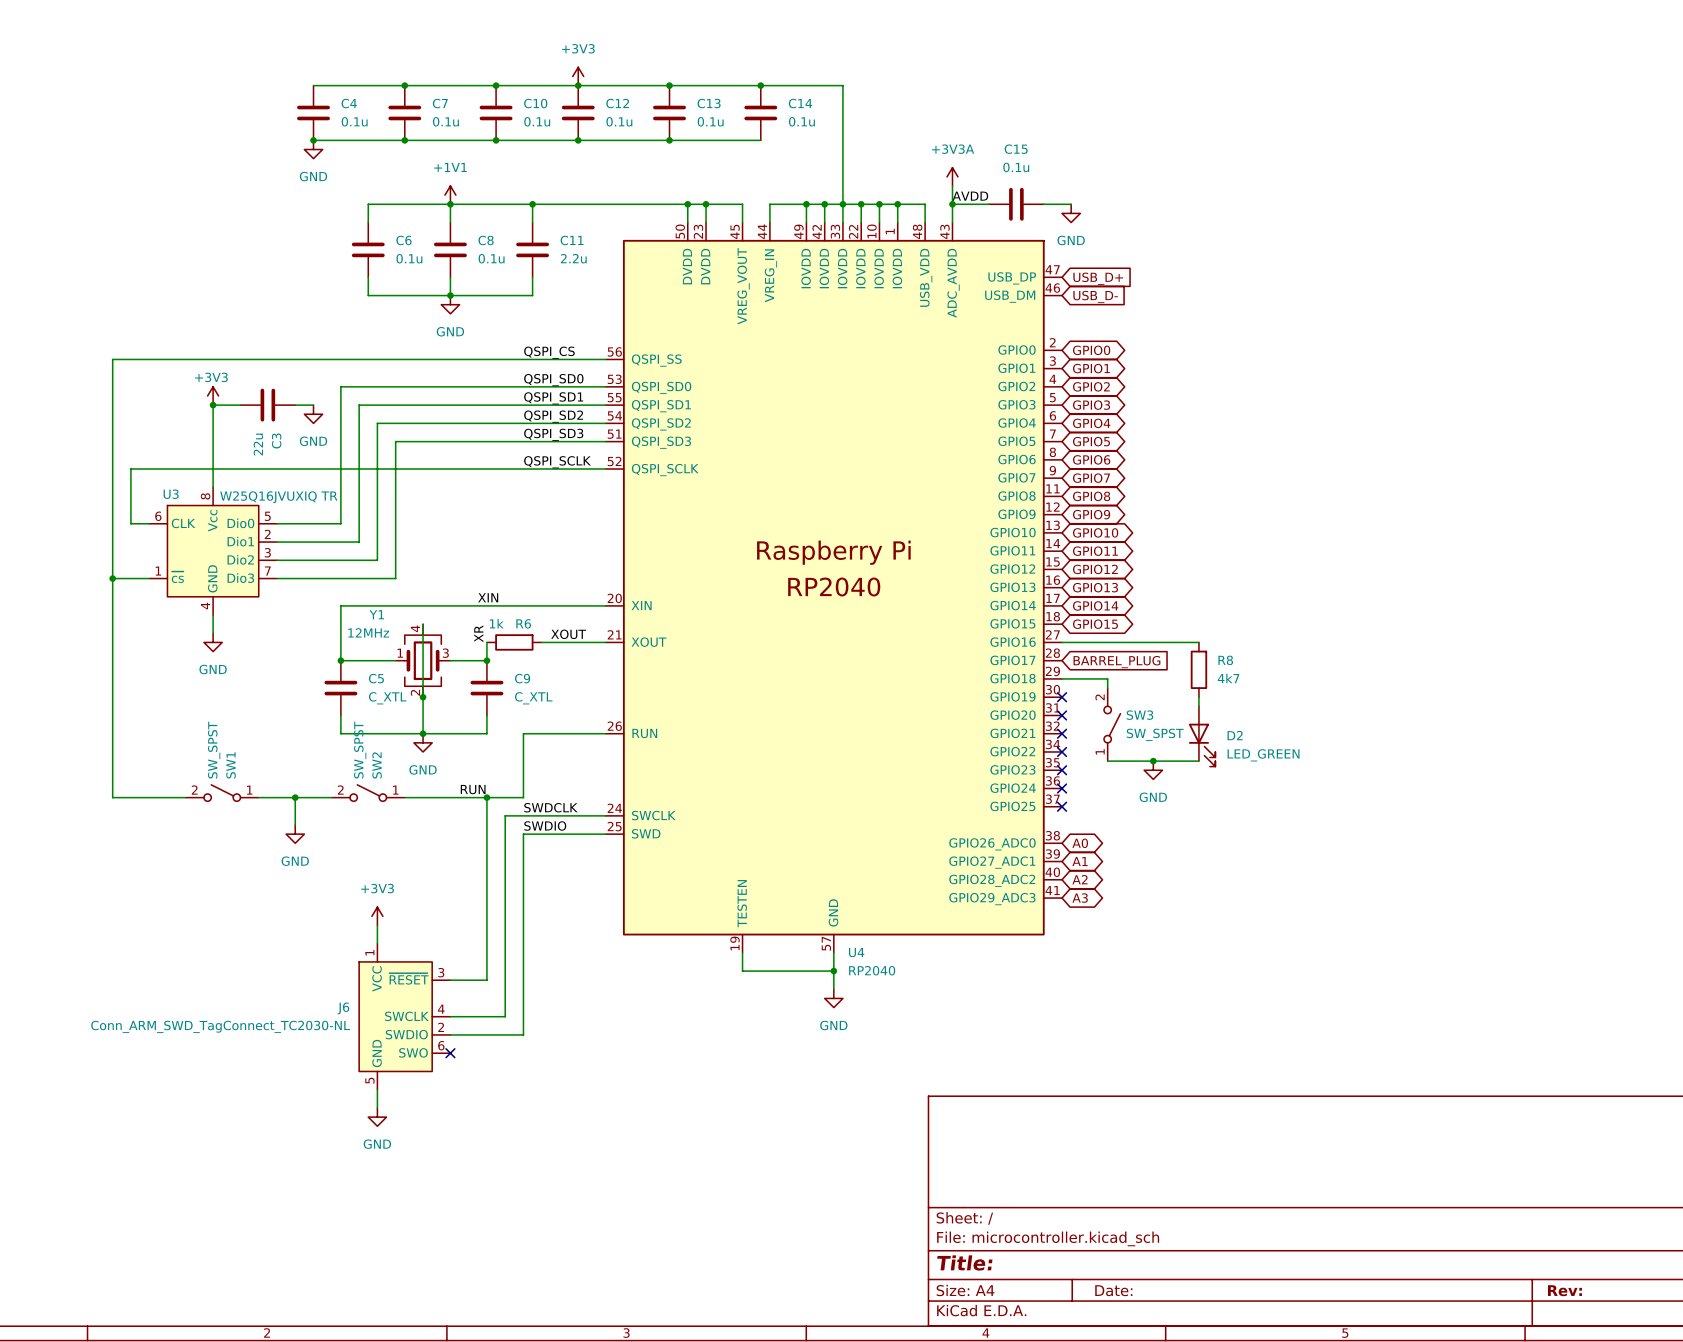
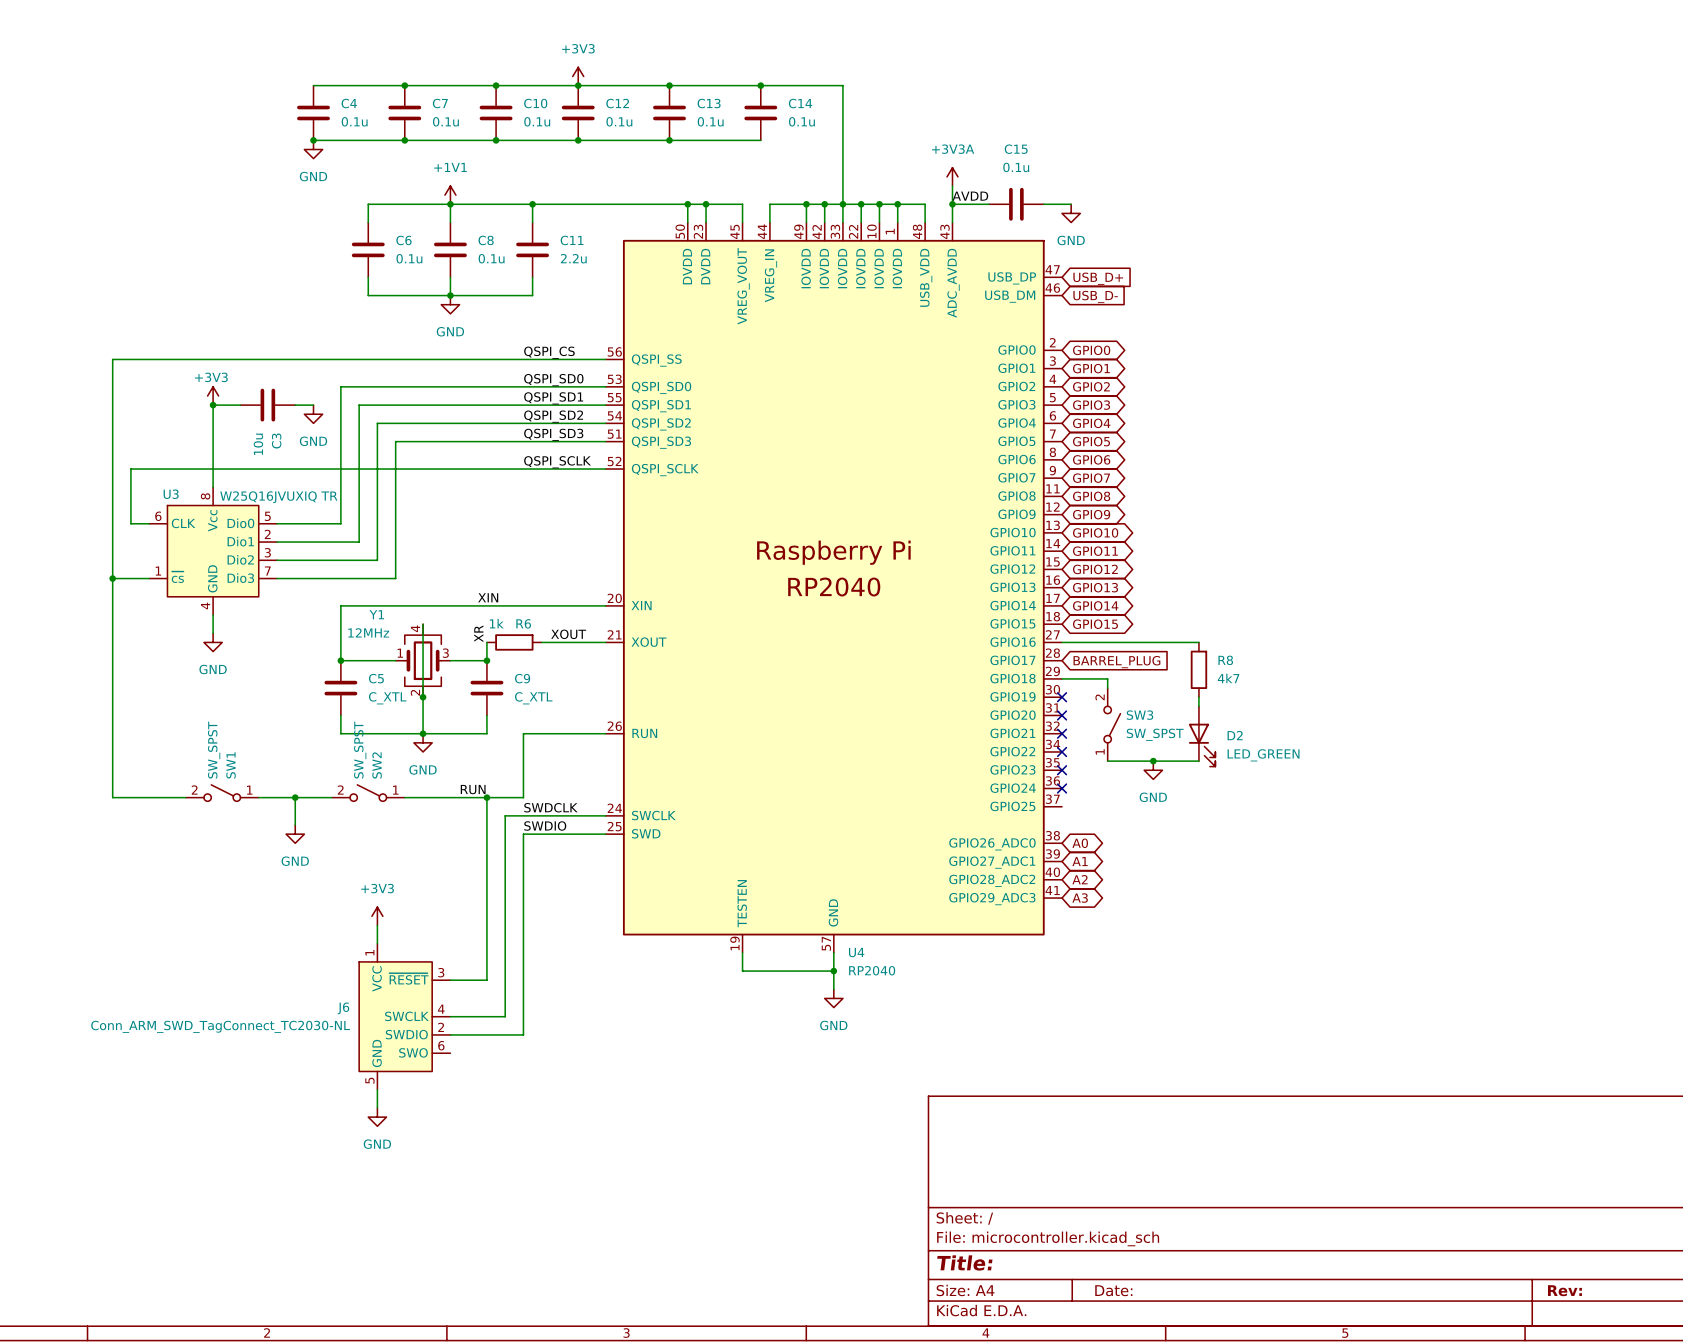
C3 value: 22u (258, 444) -> 10u (258, 444)
no-connect mark: (1062, 806) -> none
no-connect mark: (450, 1053) -> none

